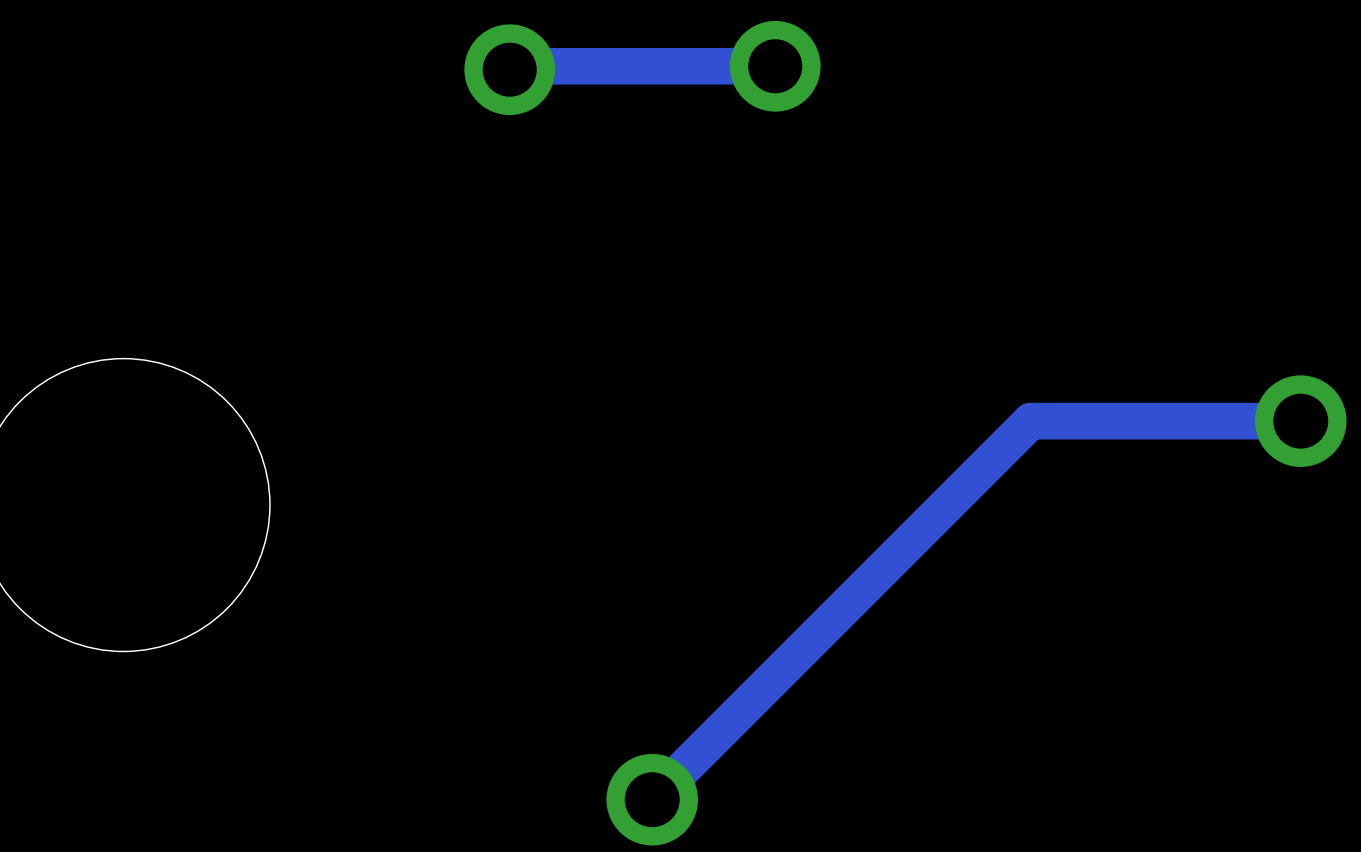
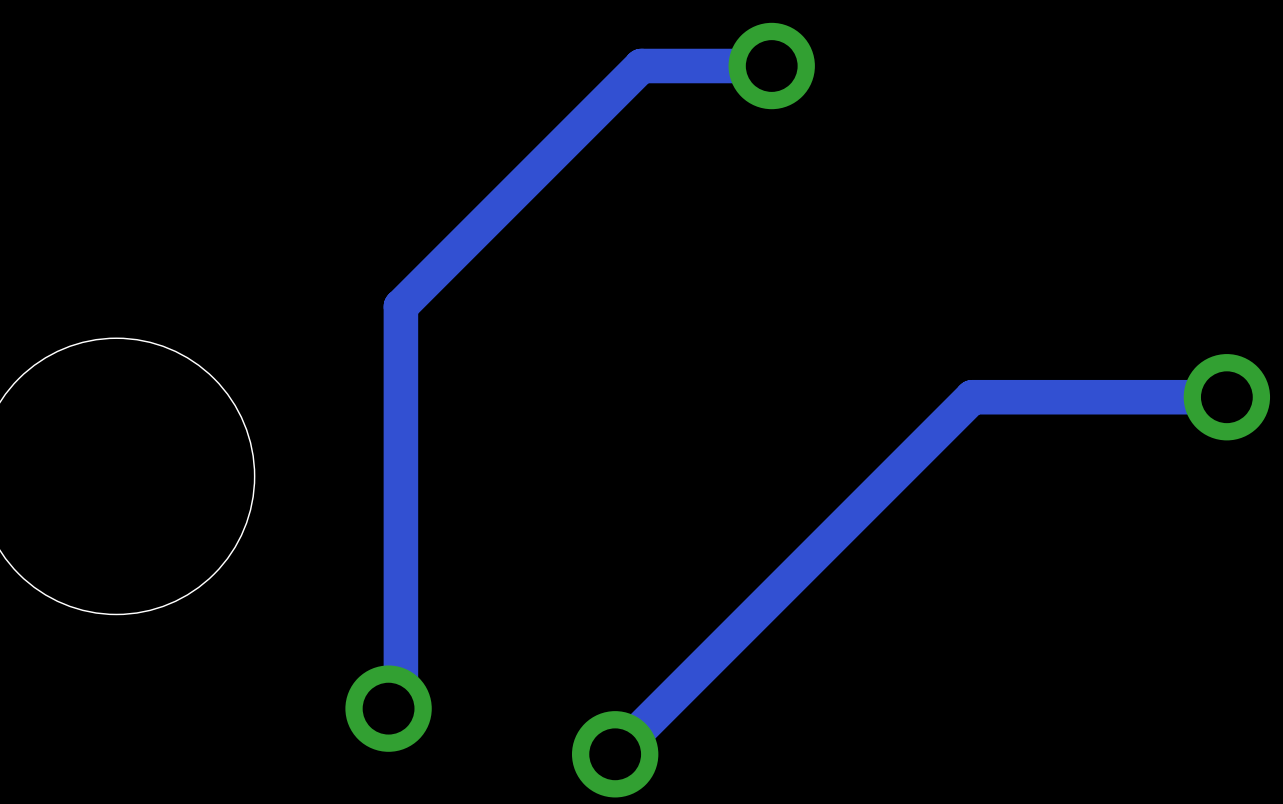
track: (775, 66) (513, 66) (509, 69) -> none
via position: (775, 66) -> (771, 66)
via: (509, 69) -> none
track: none -> (771, 66) (641, 66) (400, 306) (400, 696) (388, 708)
via: none -> (388, 708)

